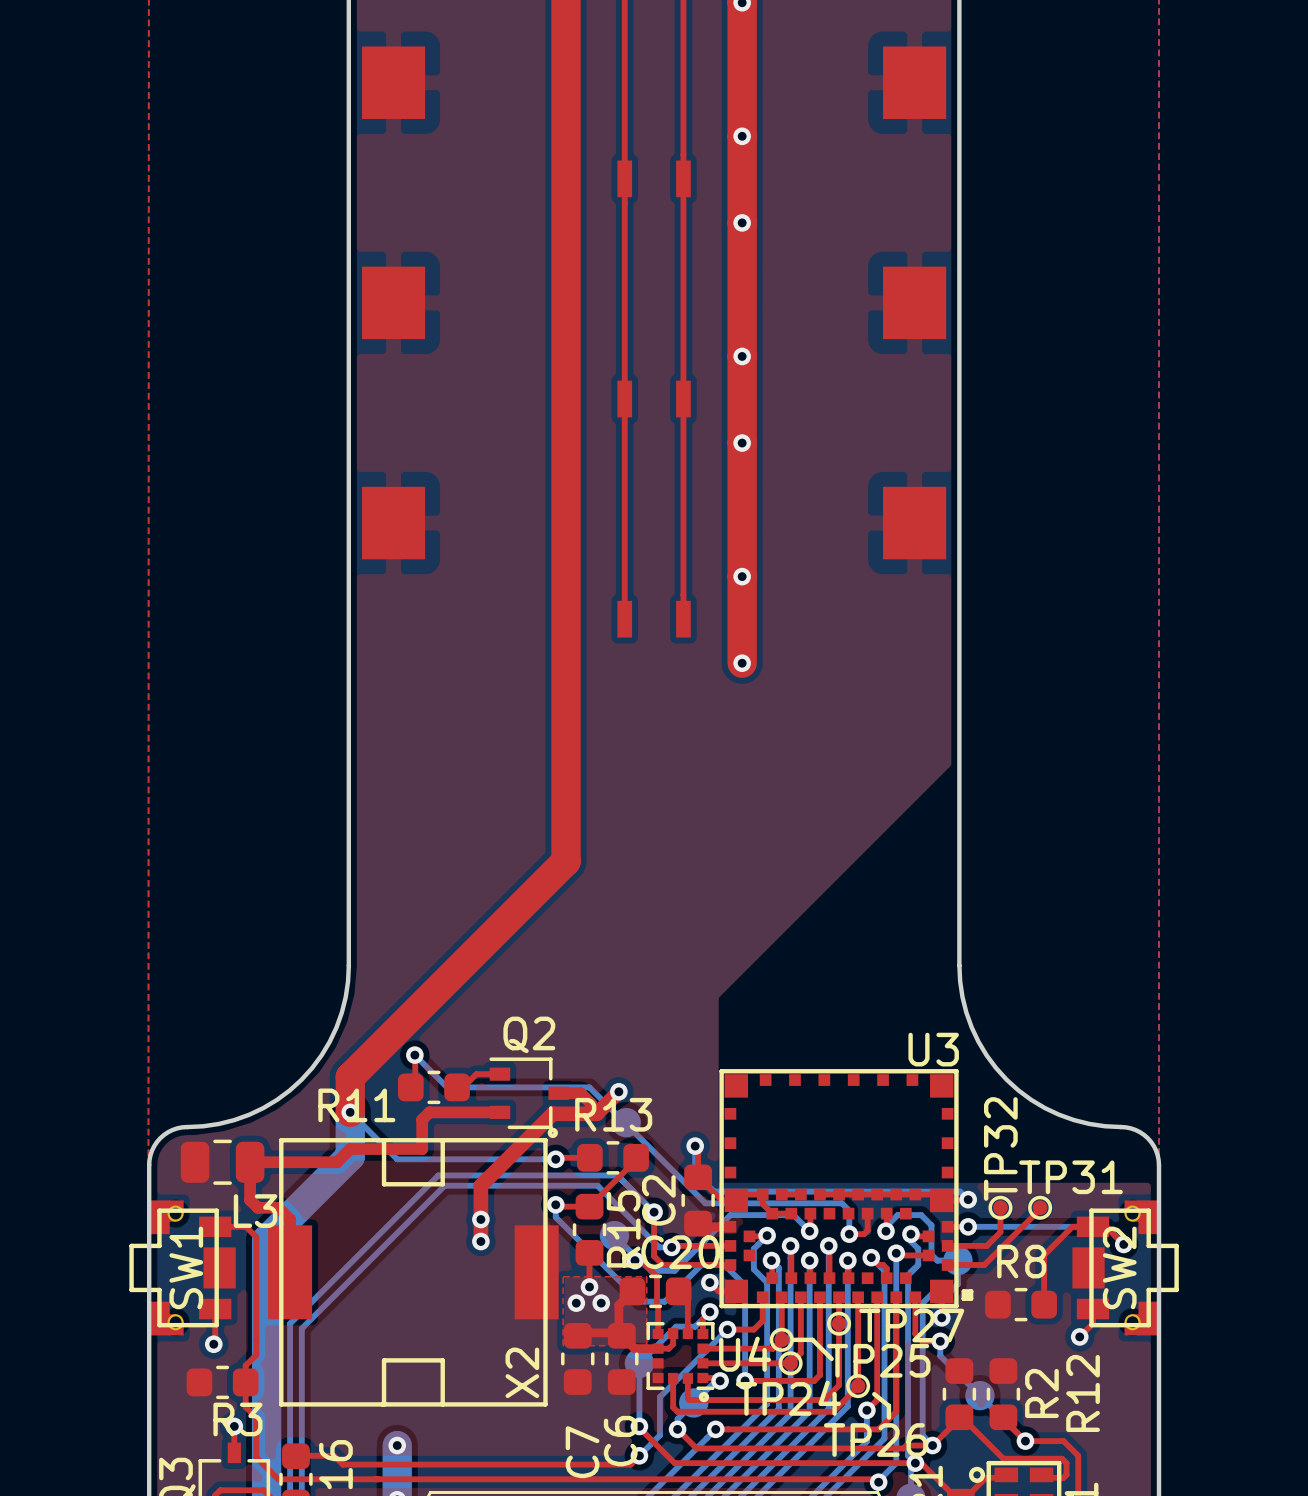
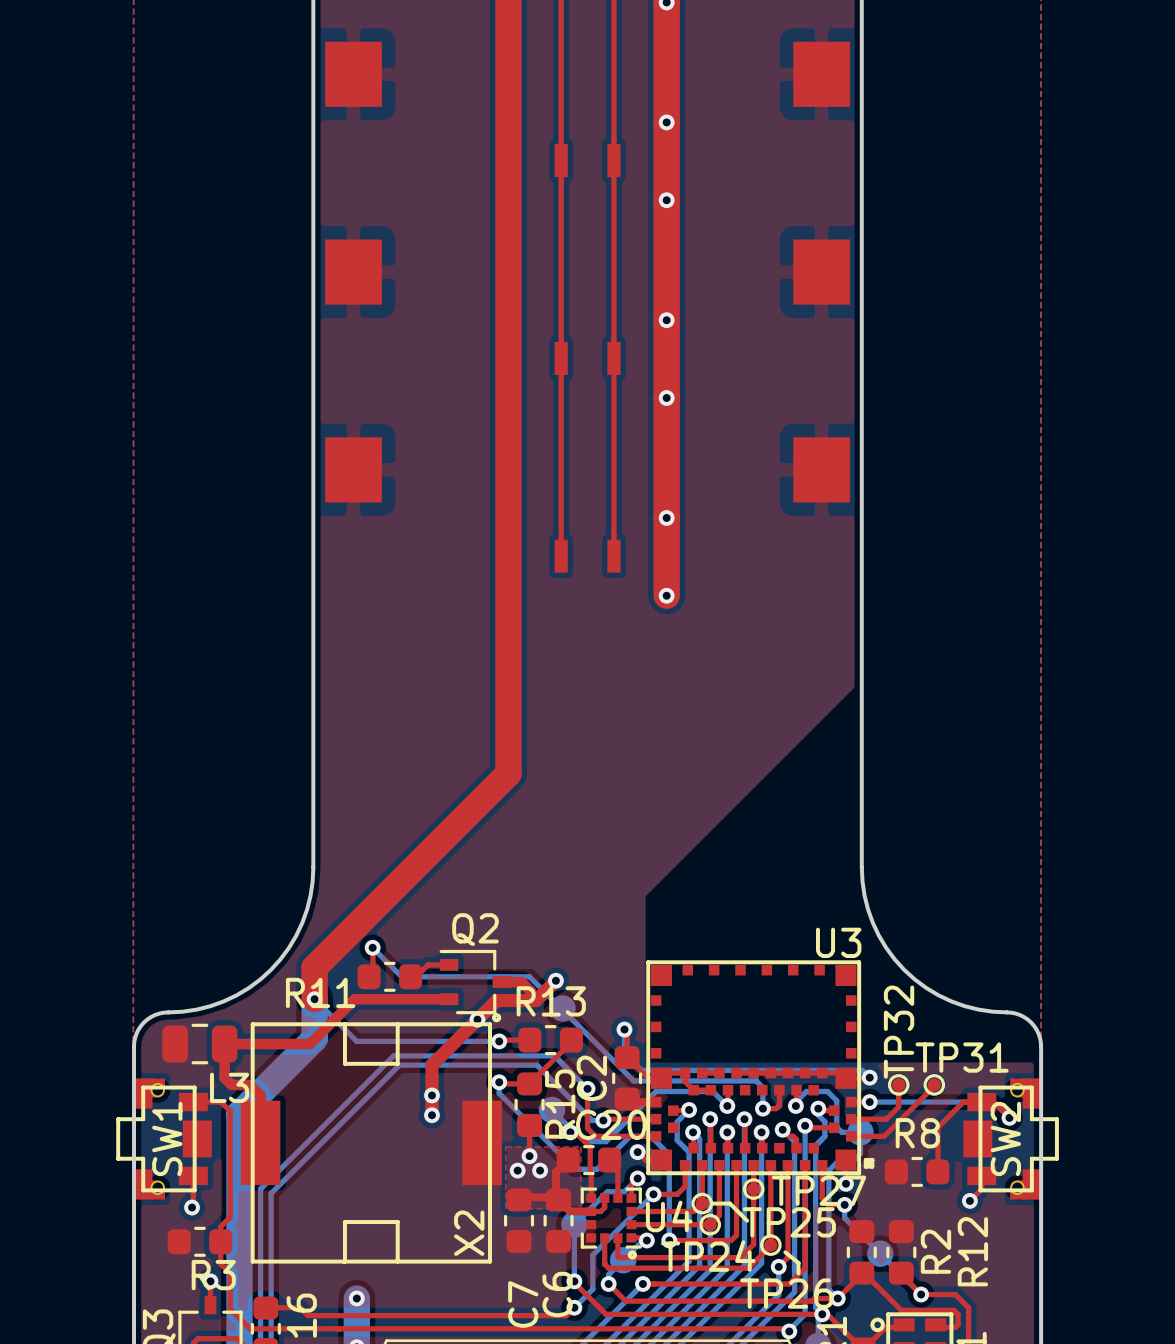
top track: (429, 1112) (422, 1119) (422, 1149) (350, 1149) (337, 1162) -> (385, 999) (354, 999) (310, 1044) (302, 1044)
via: none -> (477, 1019)

